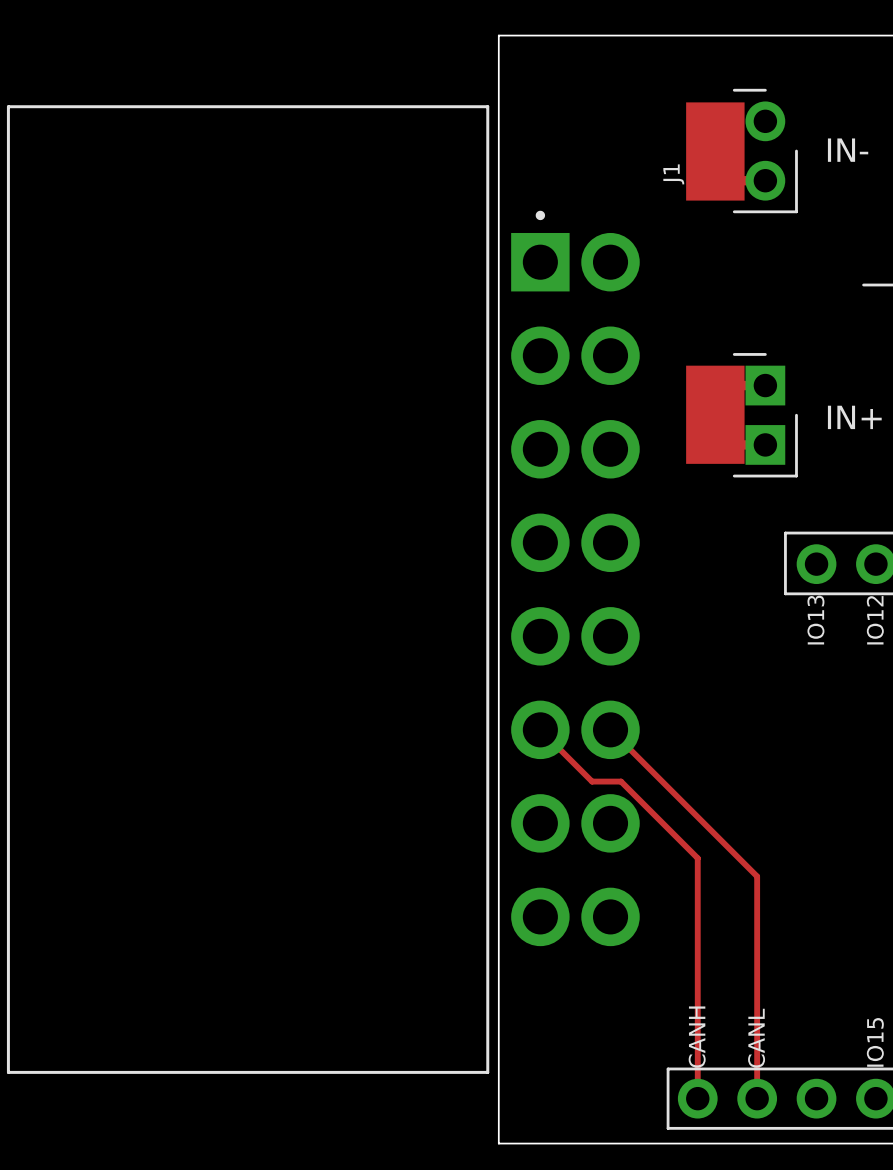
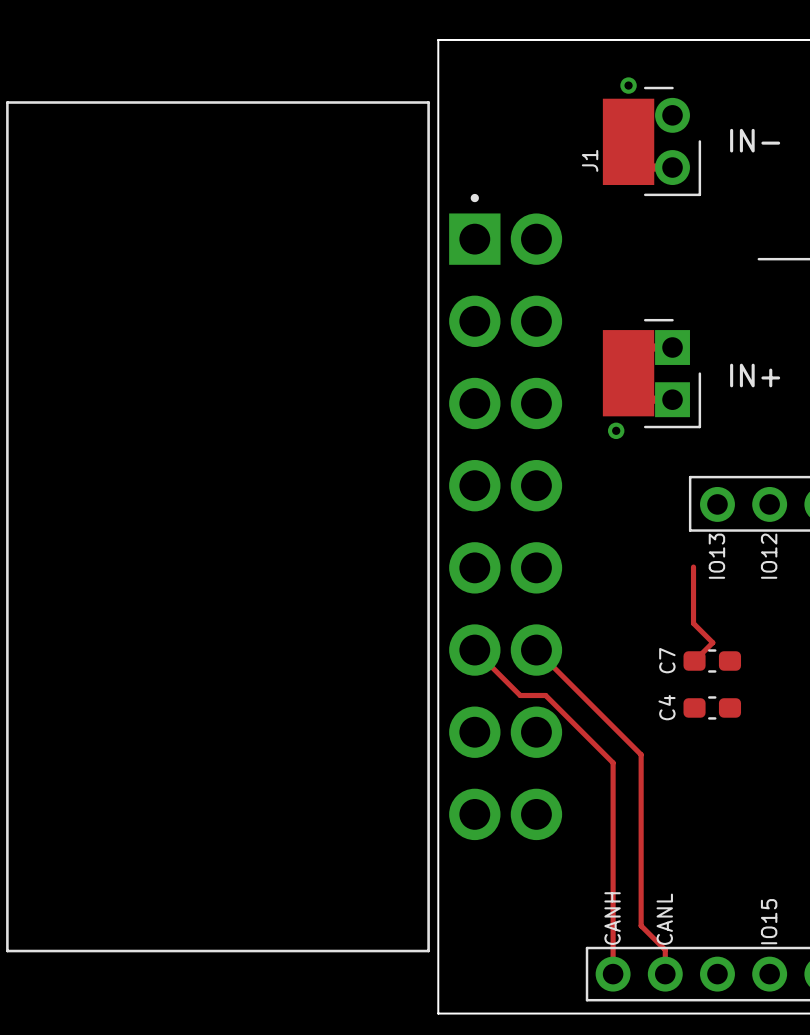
via: none -> (628, 85)
via: none -> (616, 430)
track: none -> (693, 567) (693, 623) (712, 642) (694, 660)
C7: none -> (712, 660)
C4: none -> (712, 707)
track: (729, 849) (757, 876) (757, 1071) -> (641, 754) (641, 925) (665, 949)

